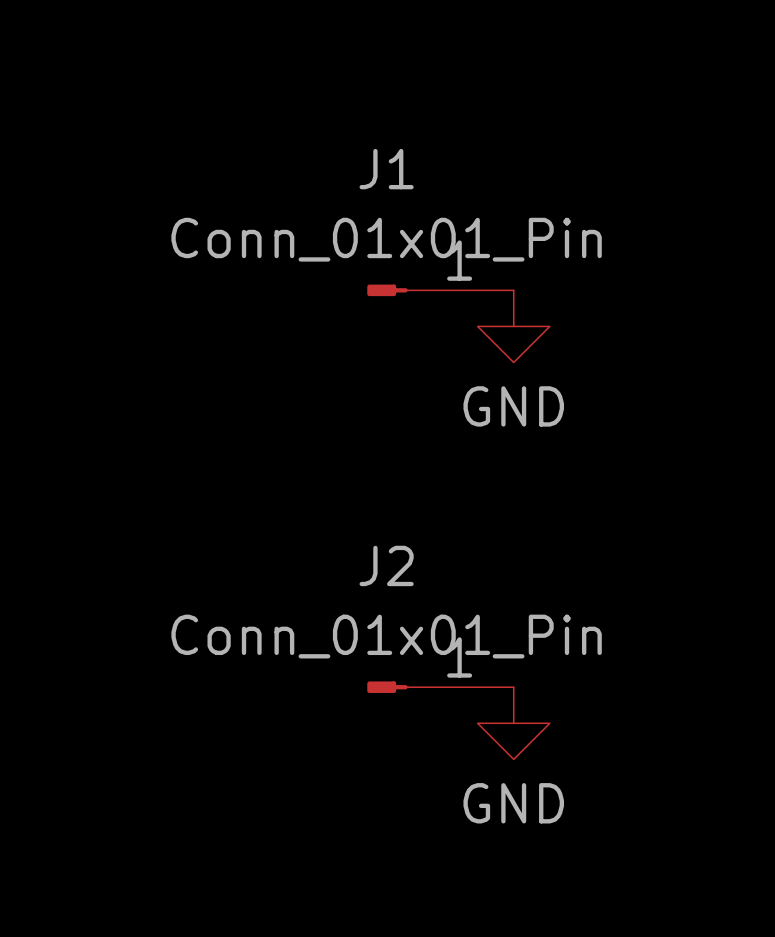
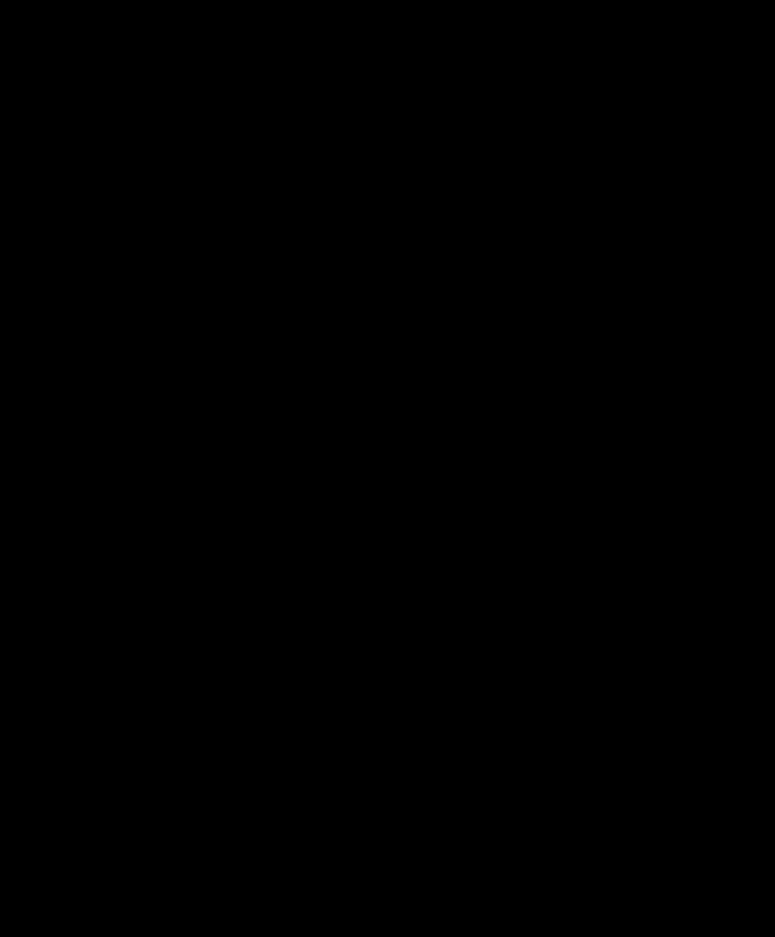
J1: Conn_01x01_Pin (440, 290) -> none
power symbol: GND (513, 326) -> none
J2: Conn_01x01_Pin (440, 687) -> none
power symbol: GND (513, 723) -> none

